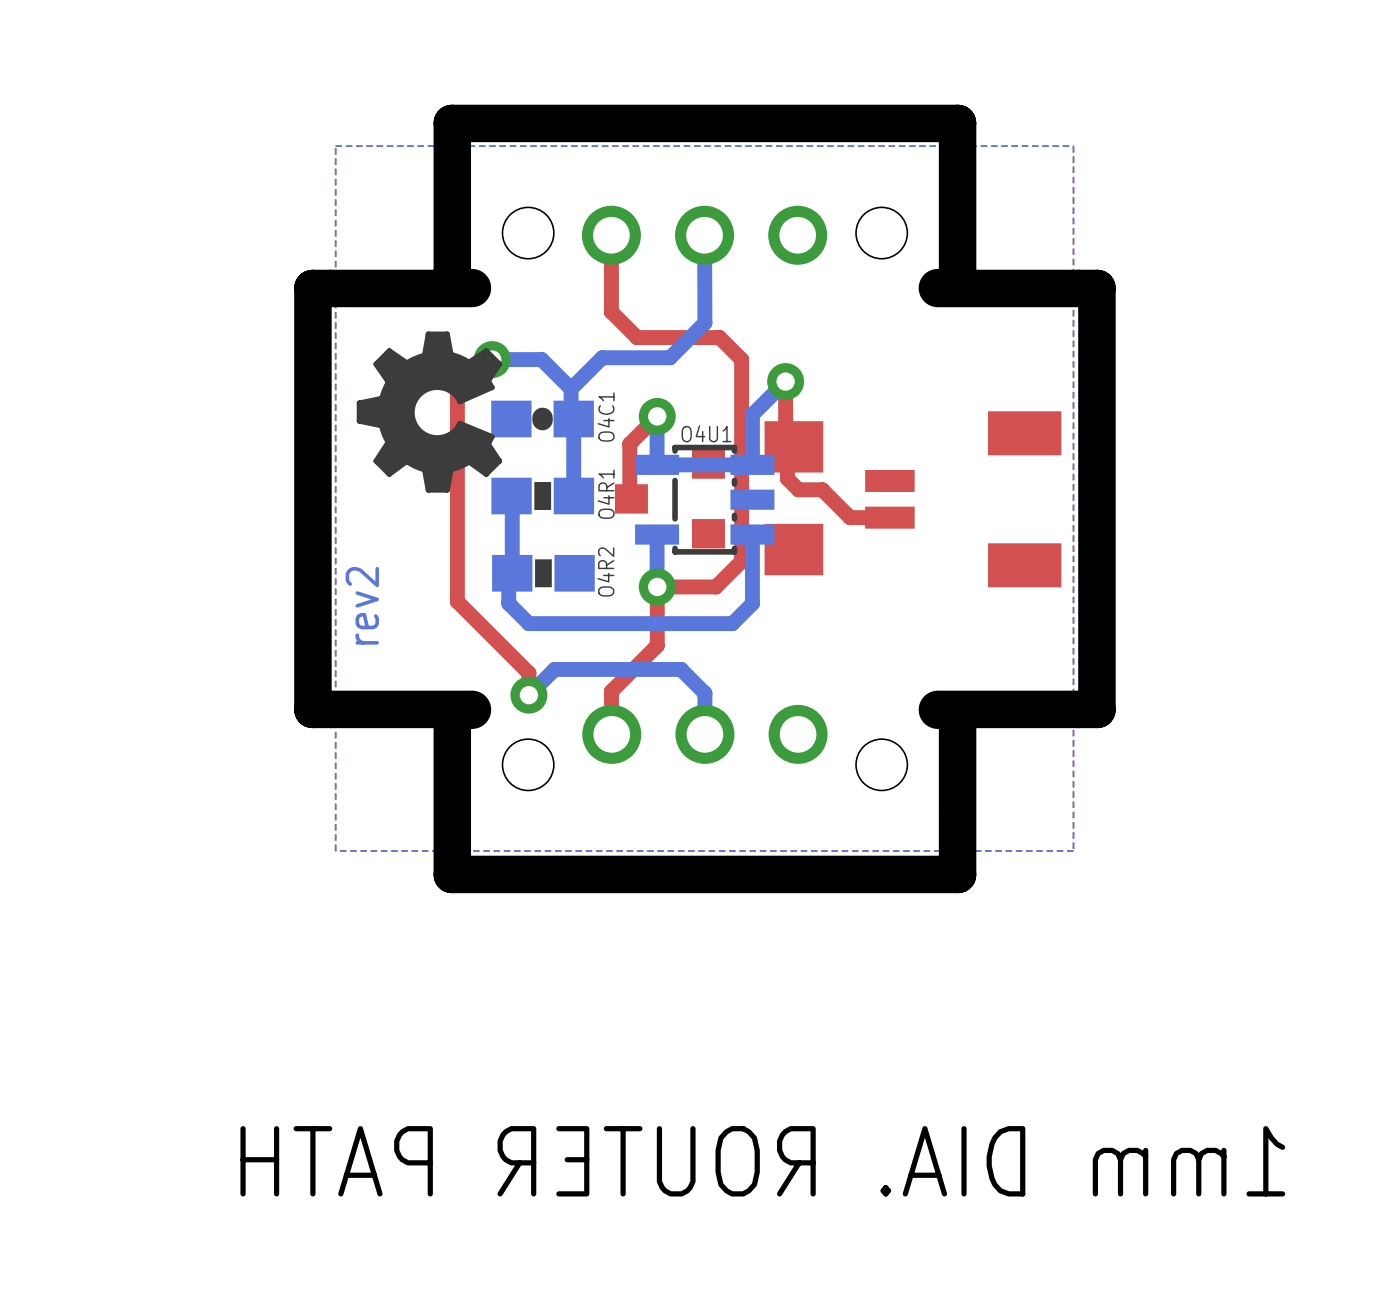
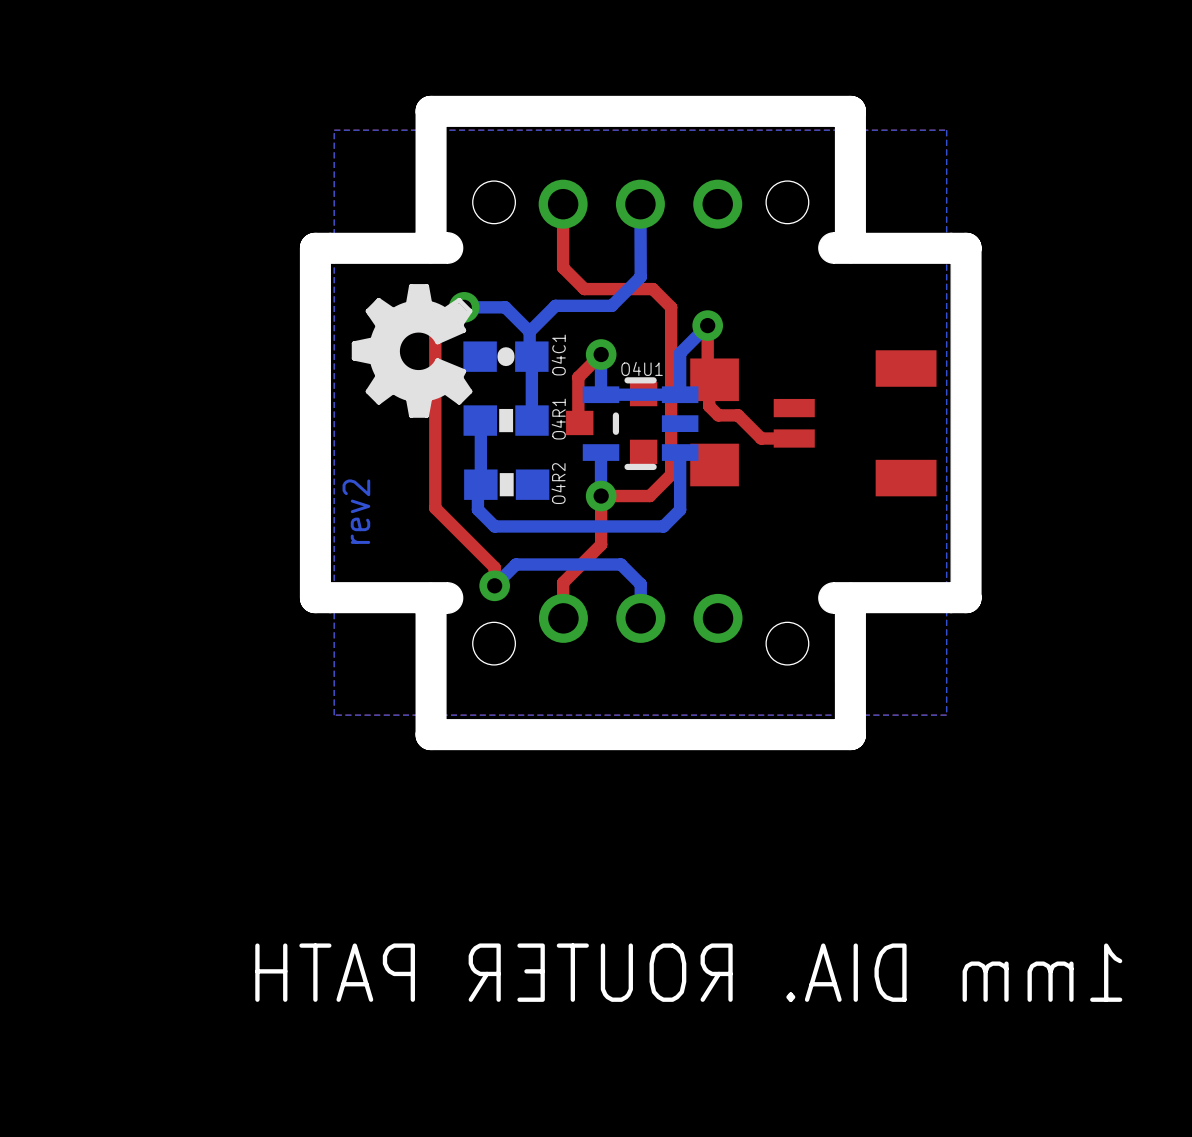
O4U1 footprint: [635, 444, 775, 555] -> [582, 377, 699, 471]

